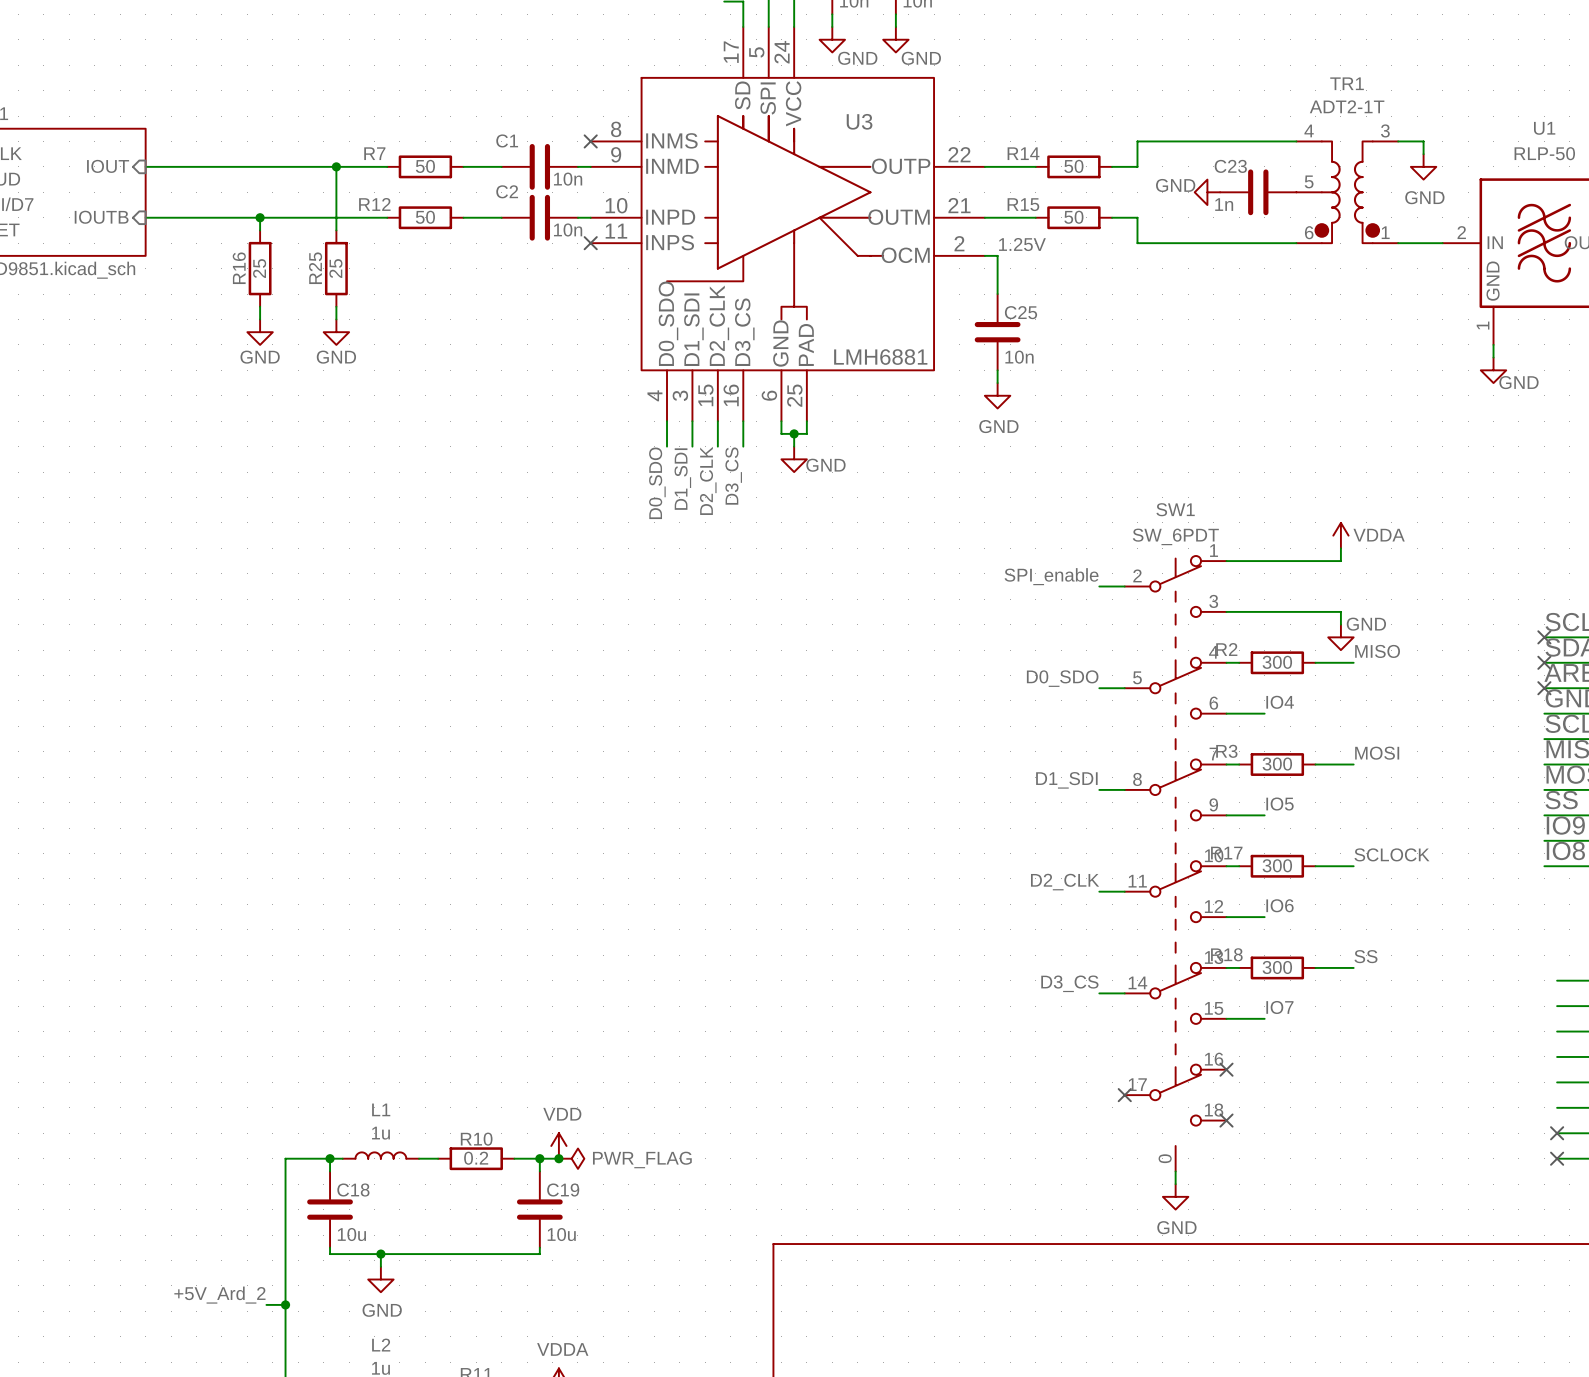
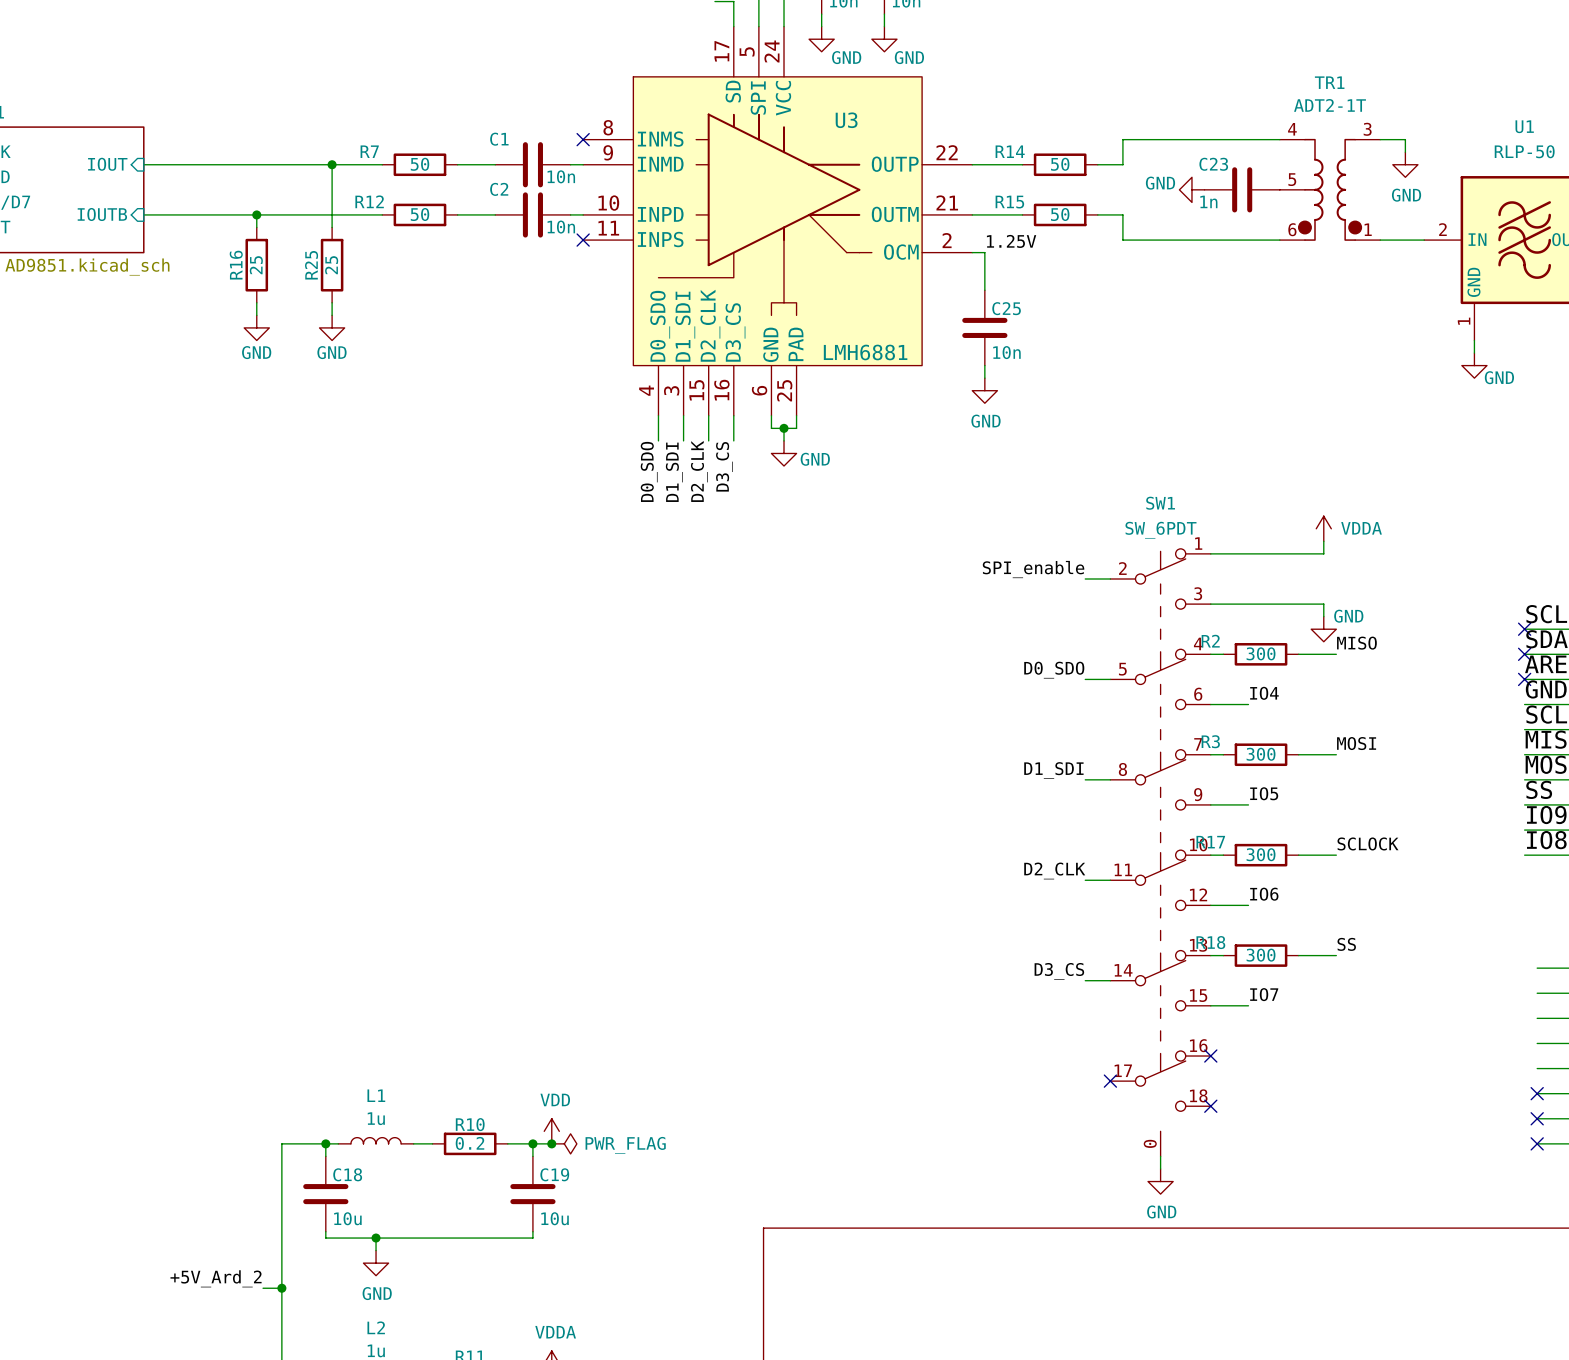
no-connect mark: none -> (1537, 1093)

